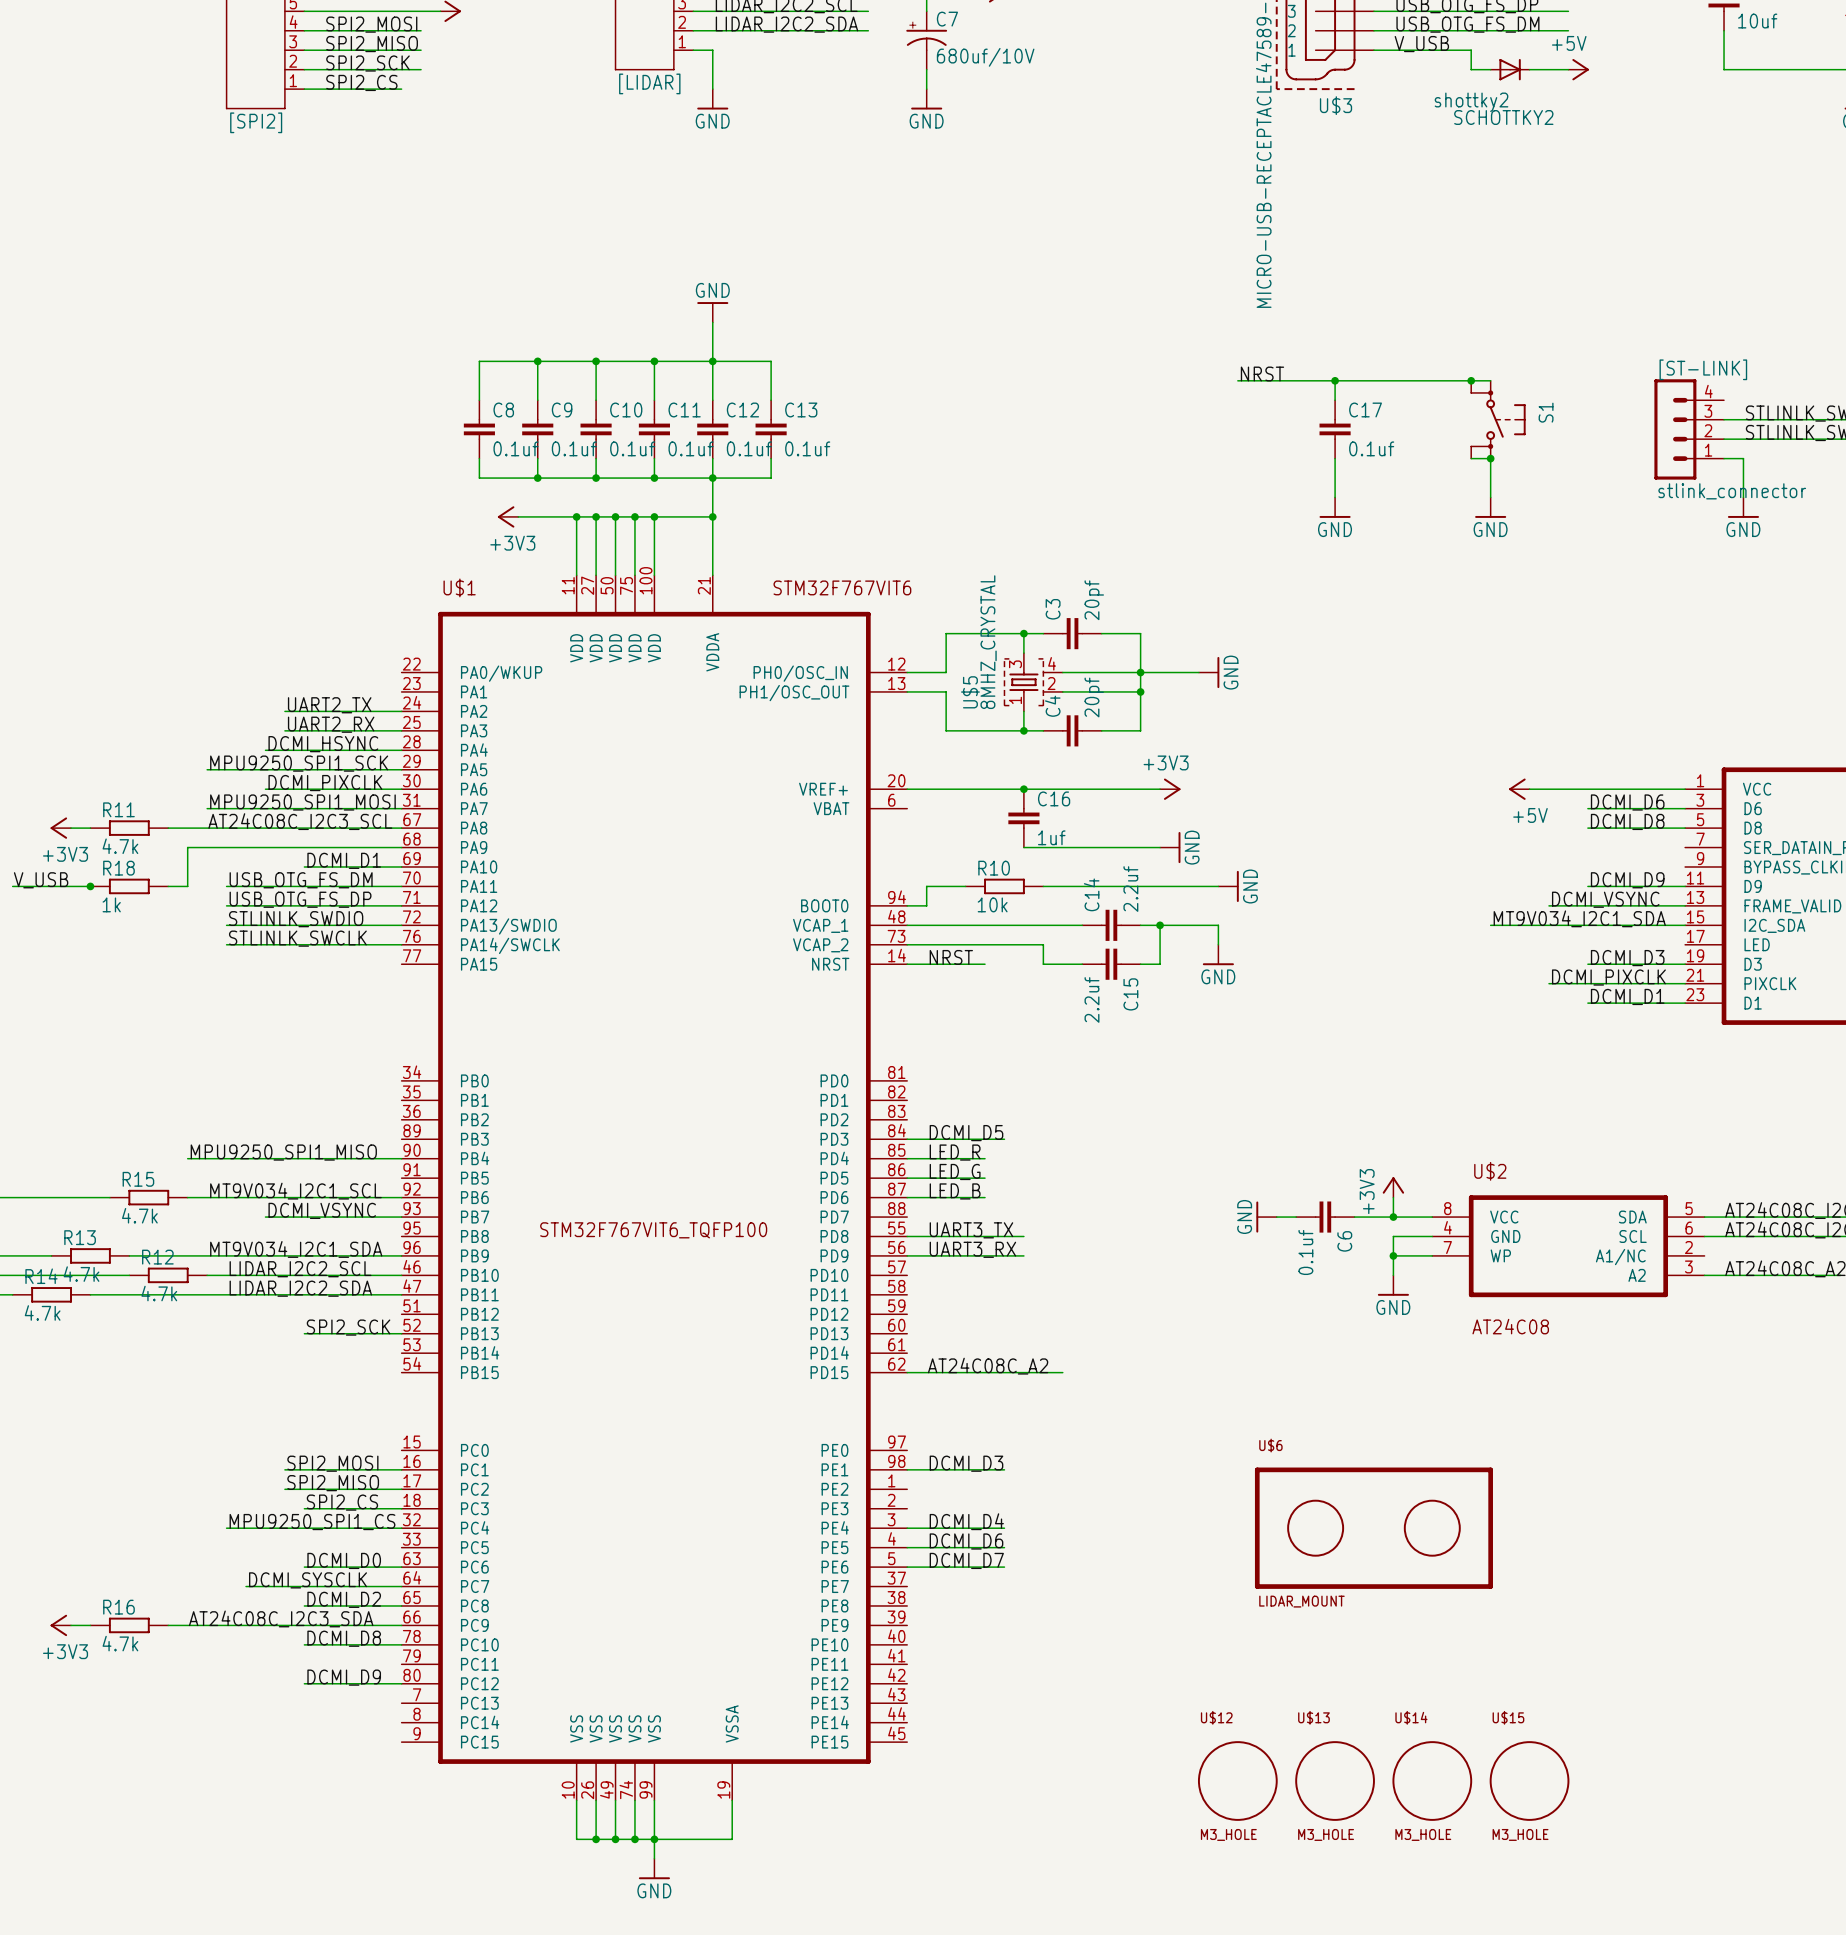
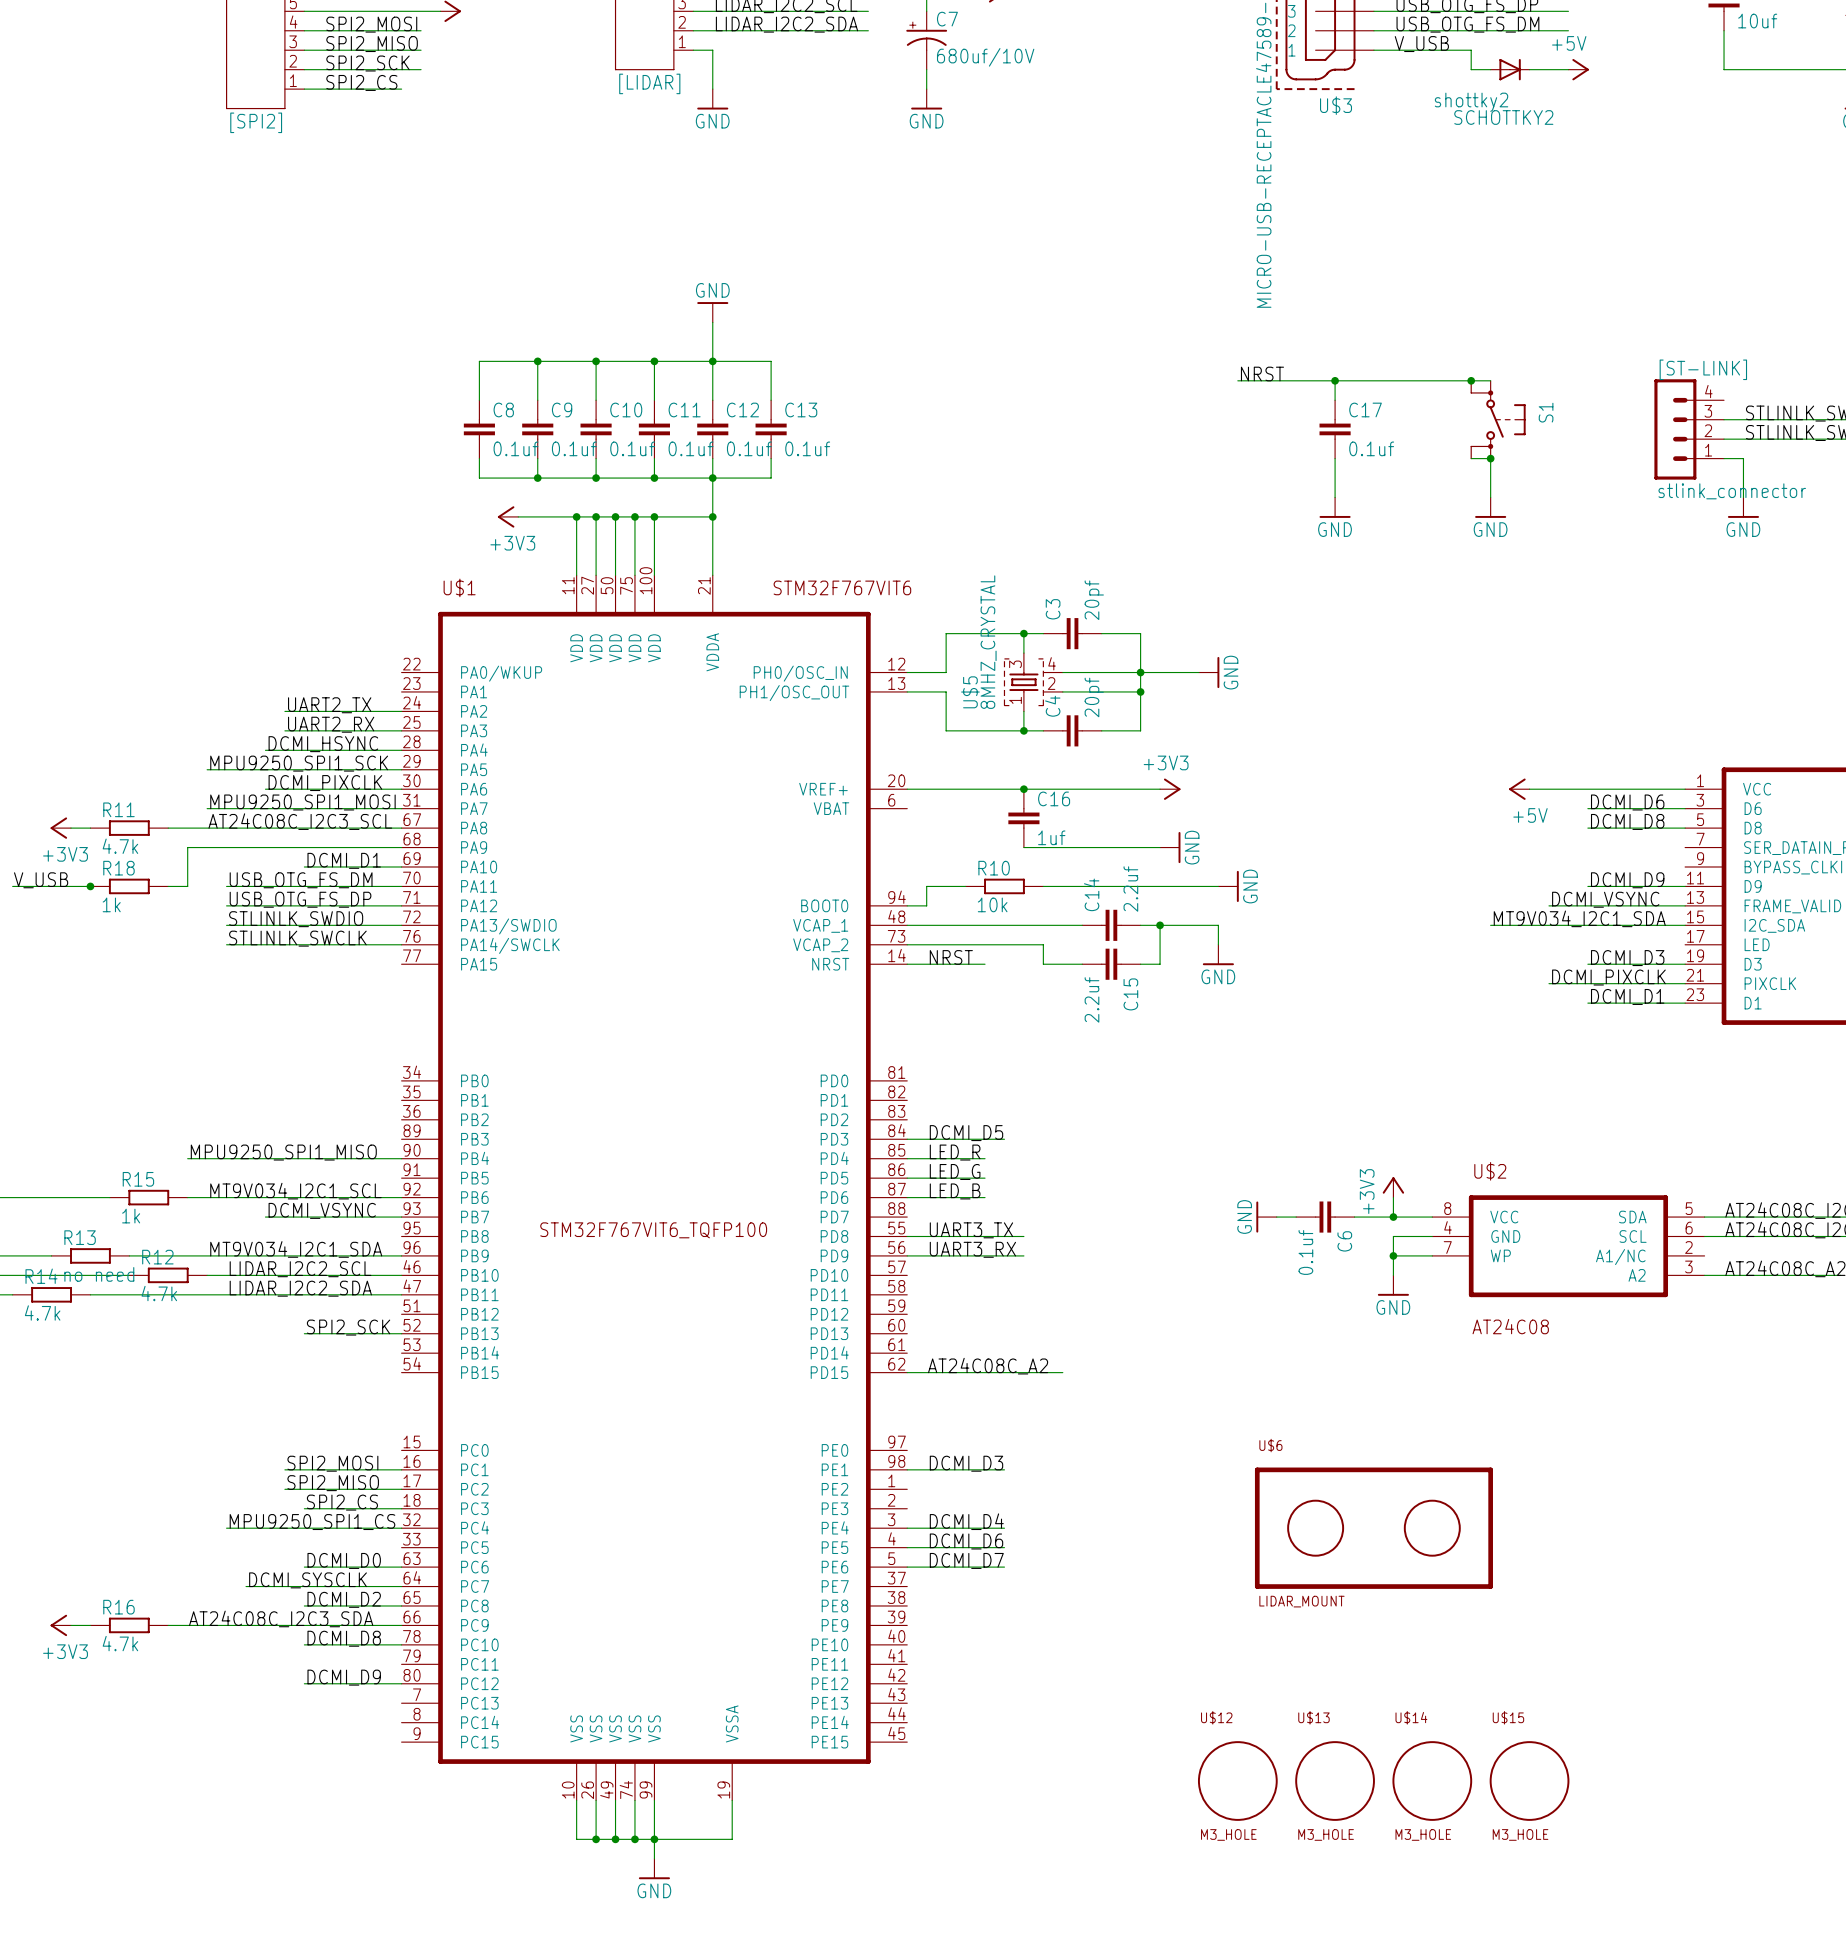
R15 value: 4.7k (139, 1215) -> 1k (131, 1216)
R13 value: 4.7k (81, 1274) -> no need (99, 1274)

